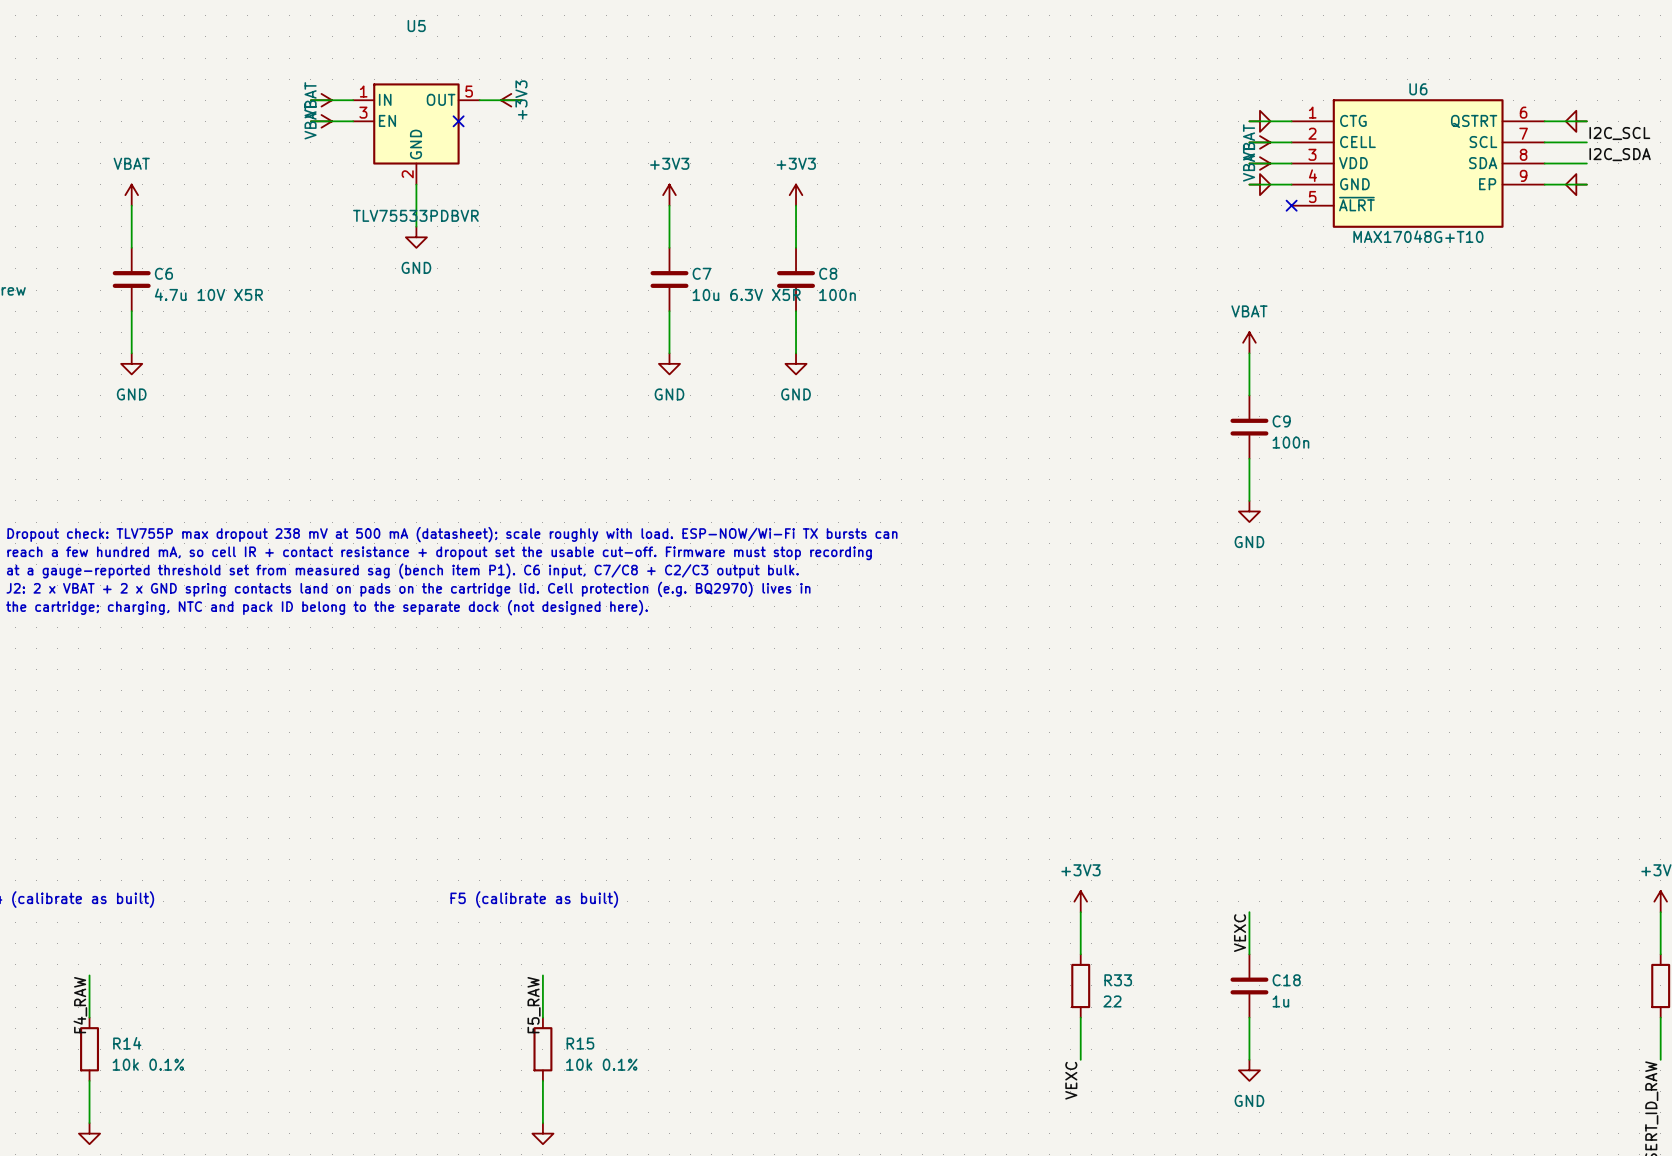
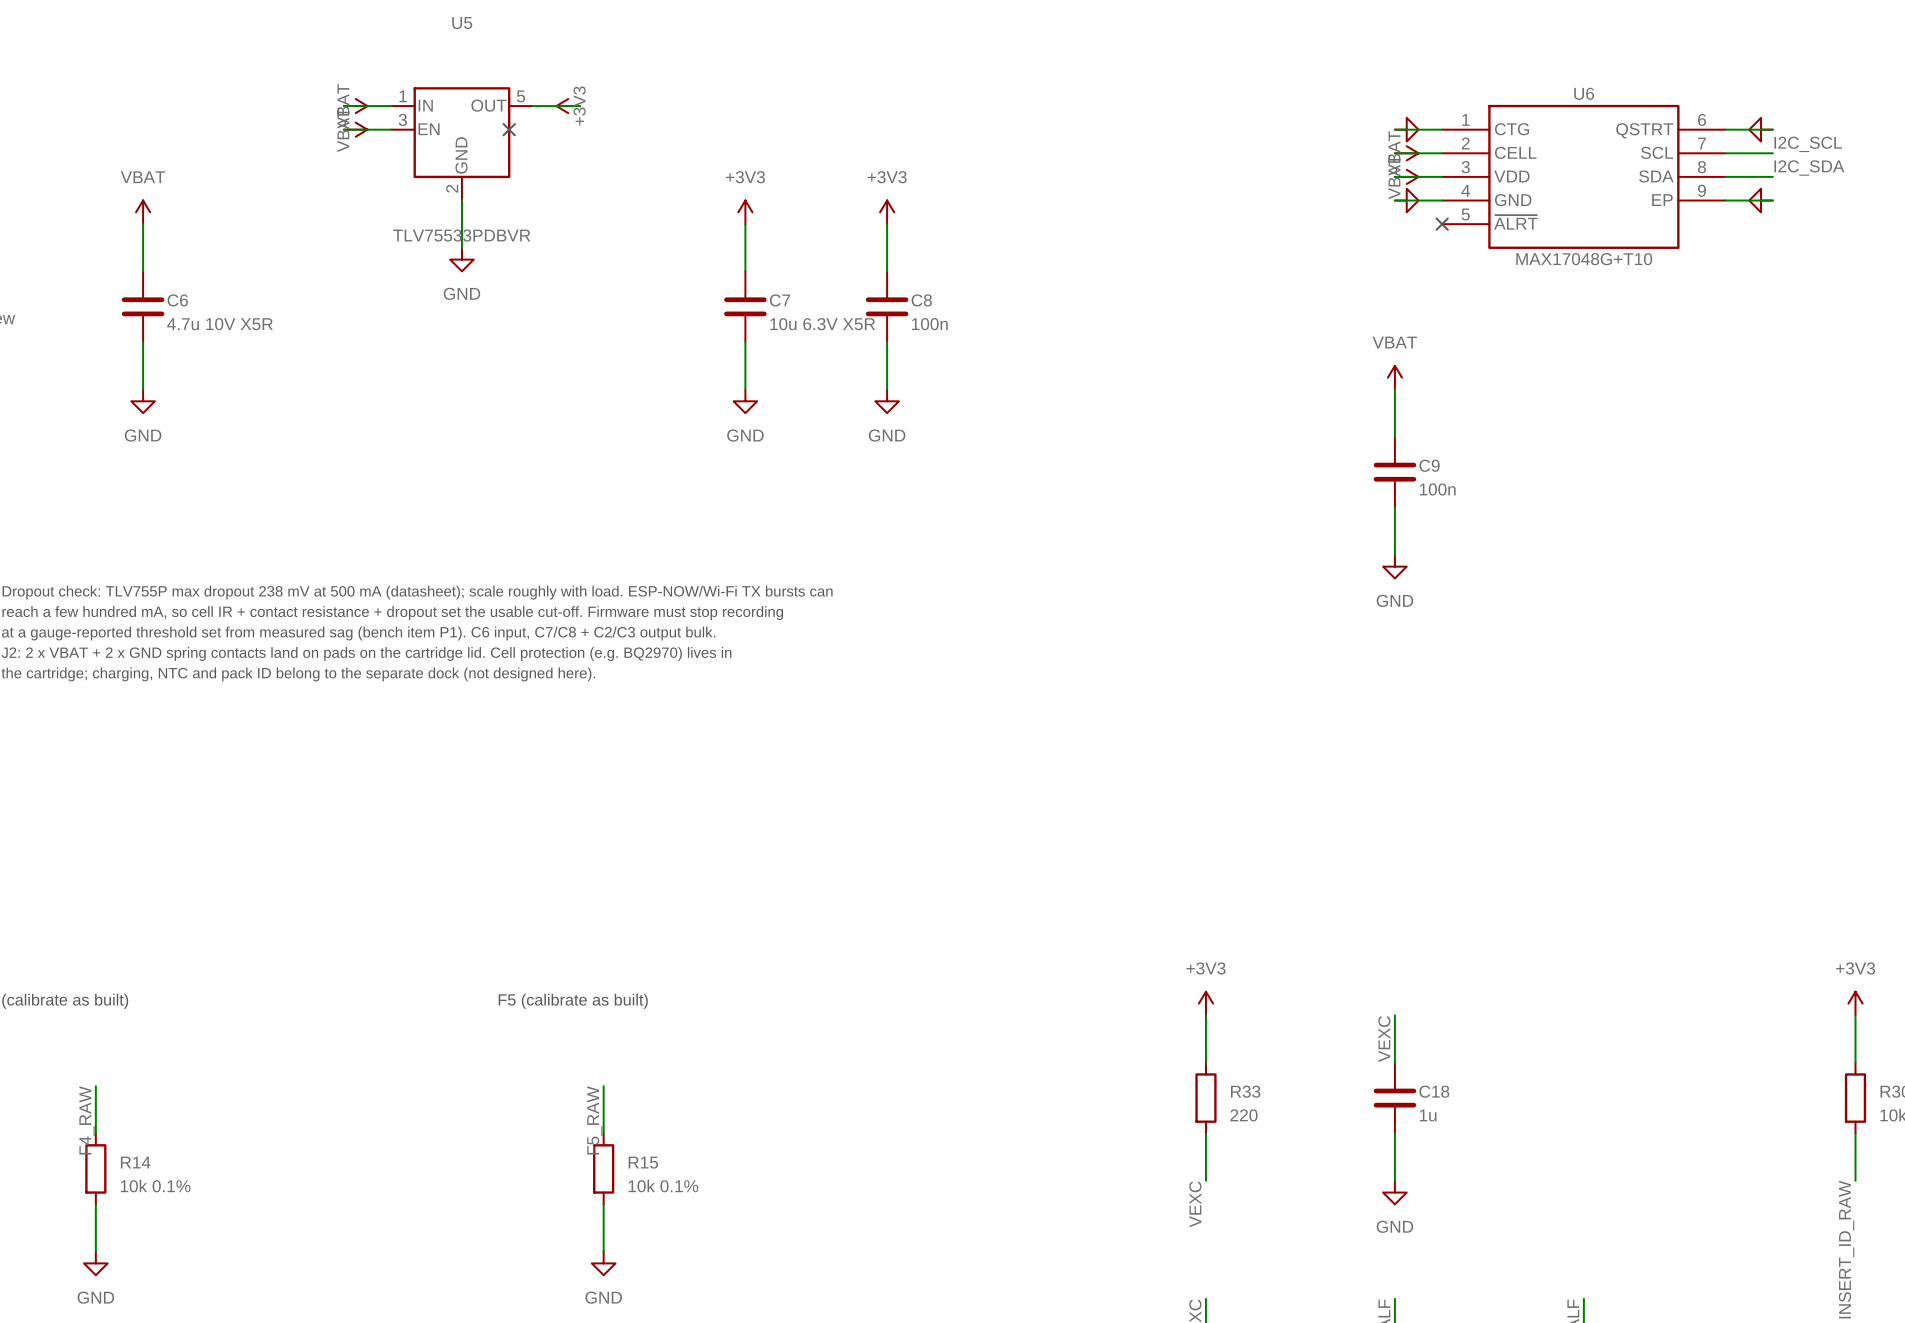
R33 value: 22 (1112, 1001) -> 220 (1244, 1115)

